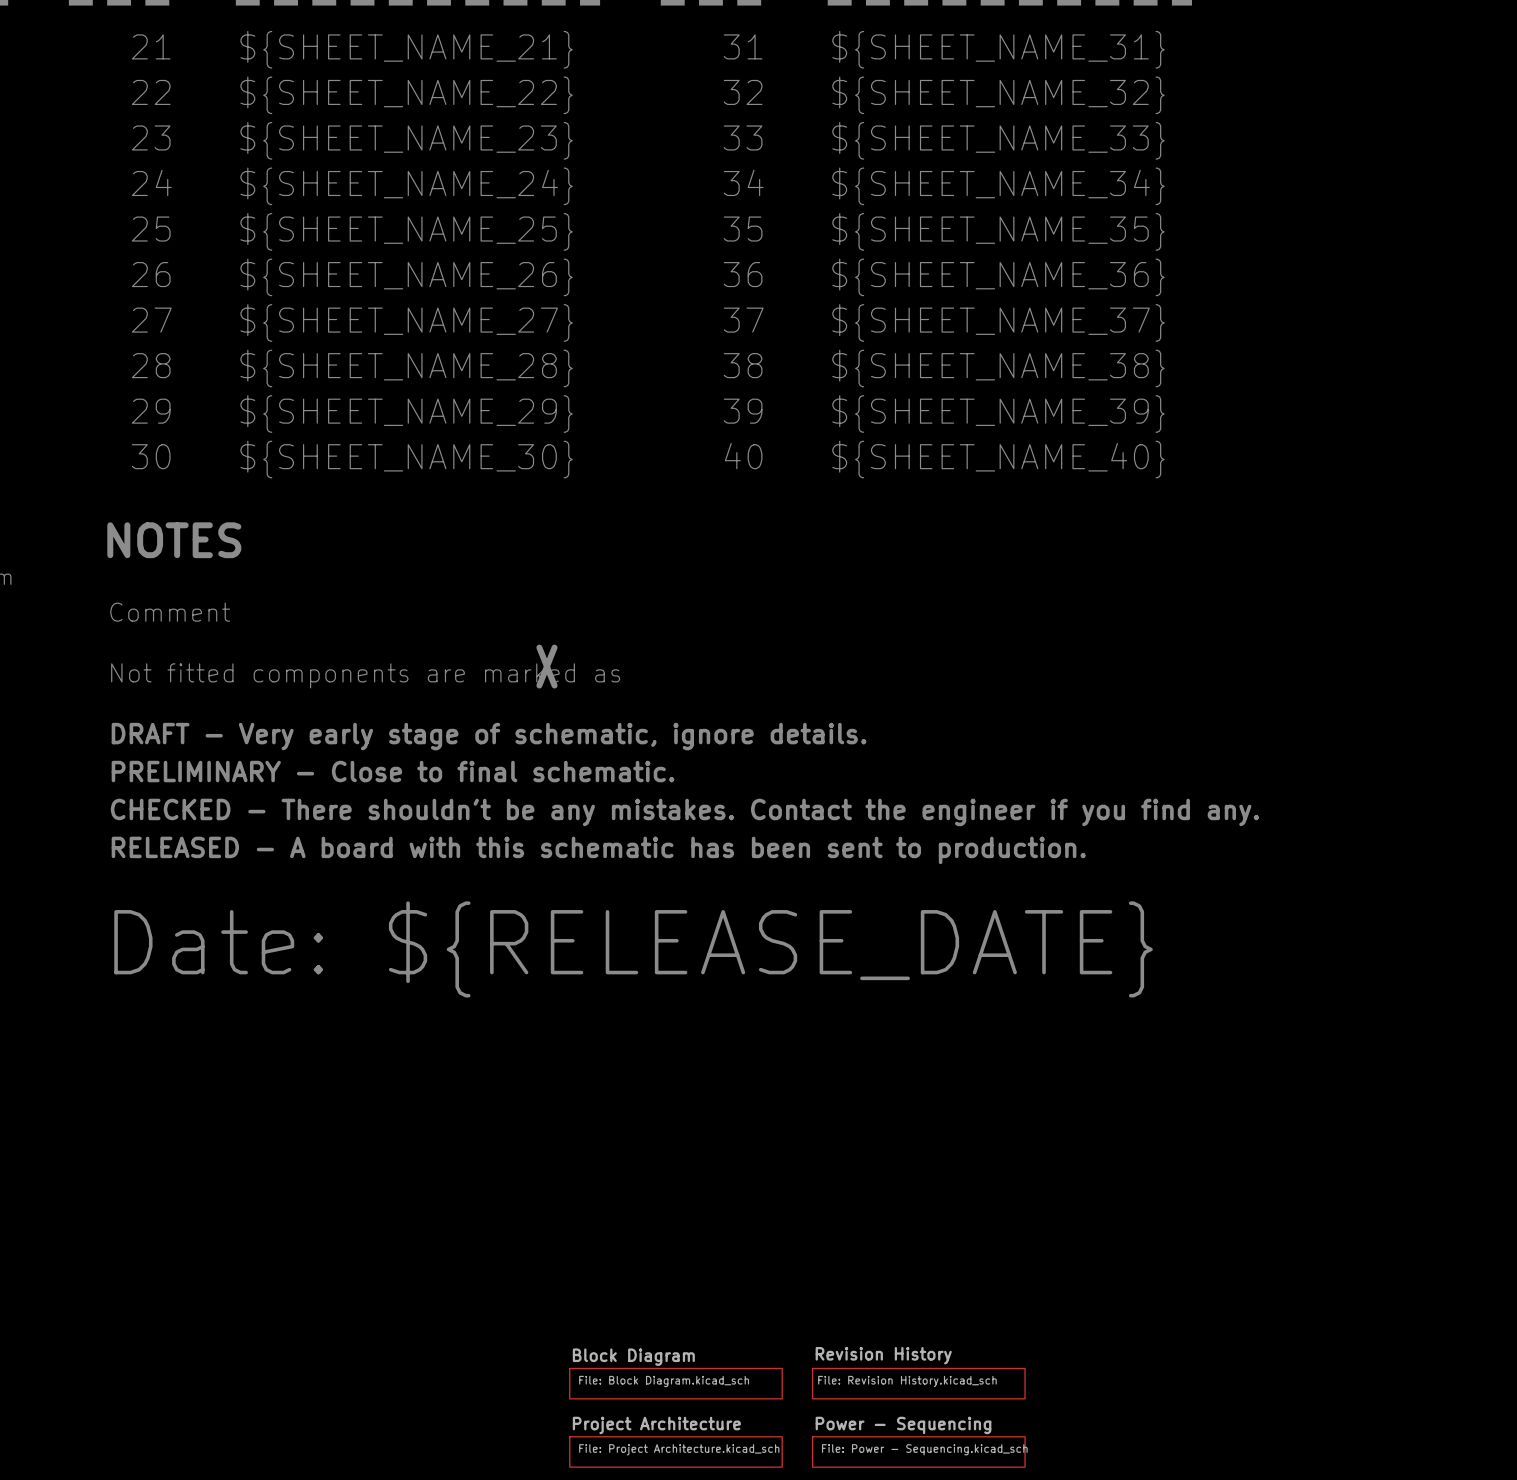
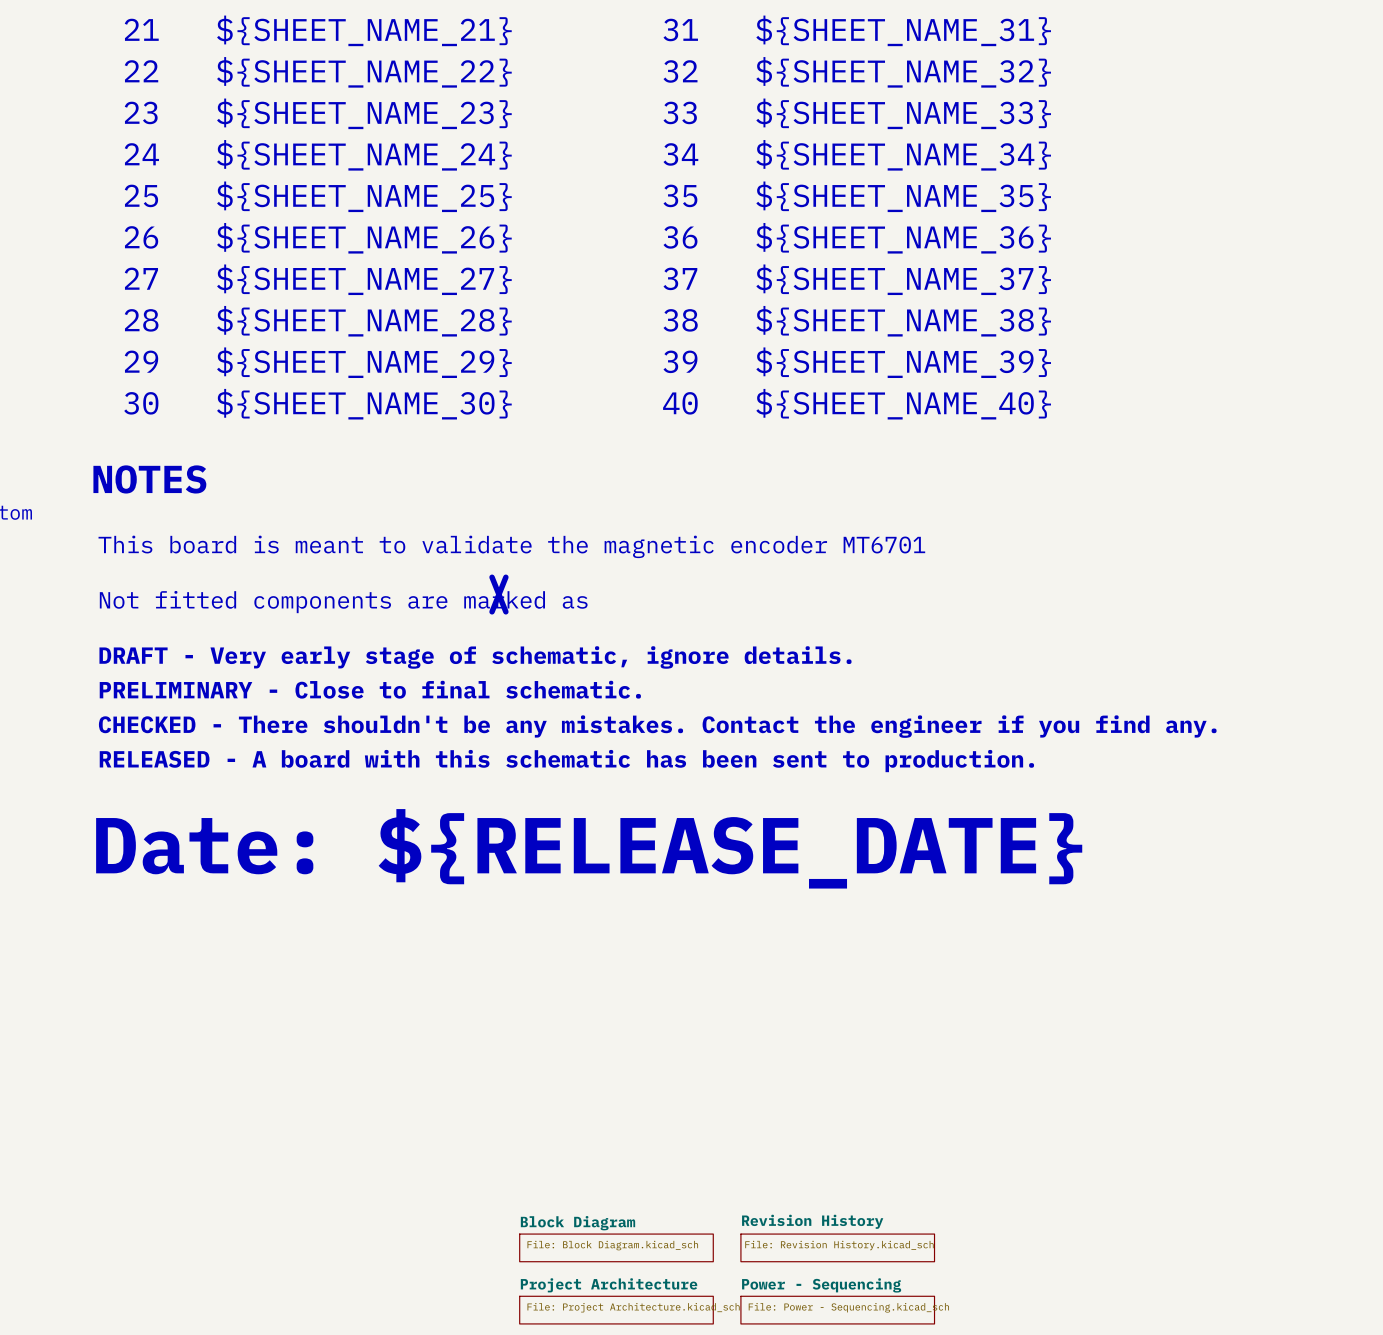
text: Comment (170, 612) -> This board is meant to validate the magnetic encoder MT6701 (511, 546)

